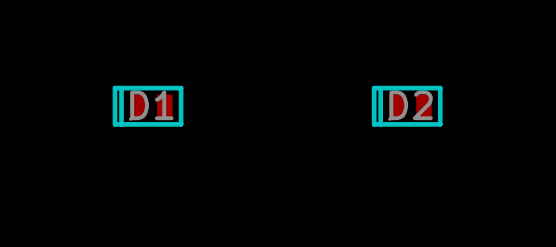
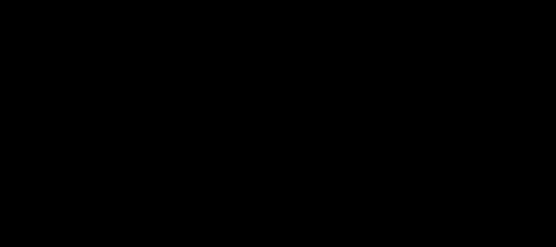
D1: (148, 106) -> none
D2: (407, 106) -> none

